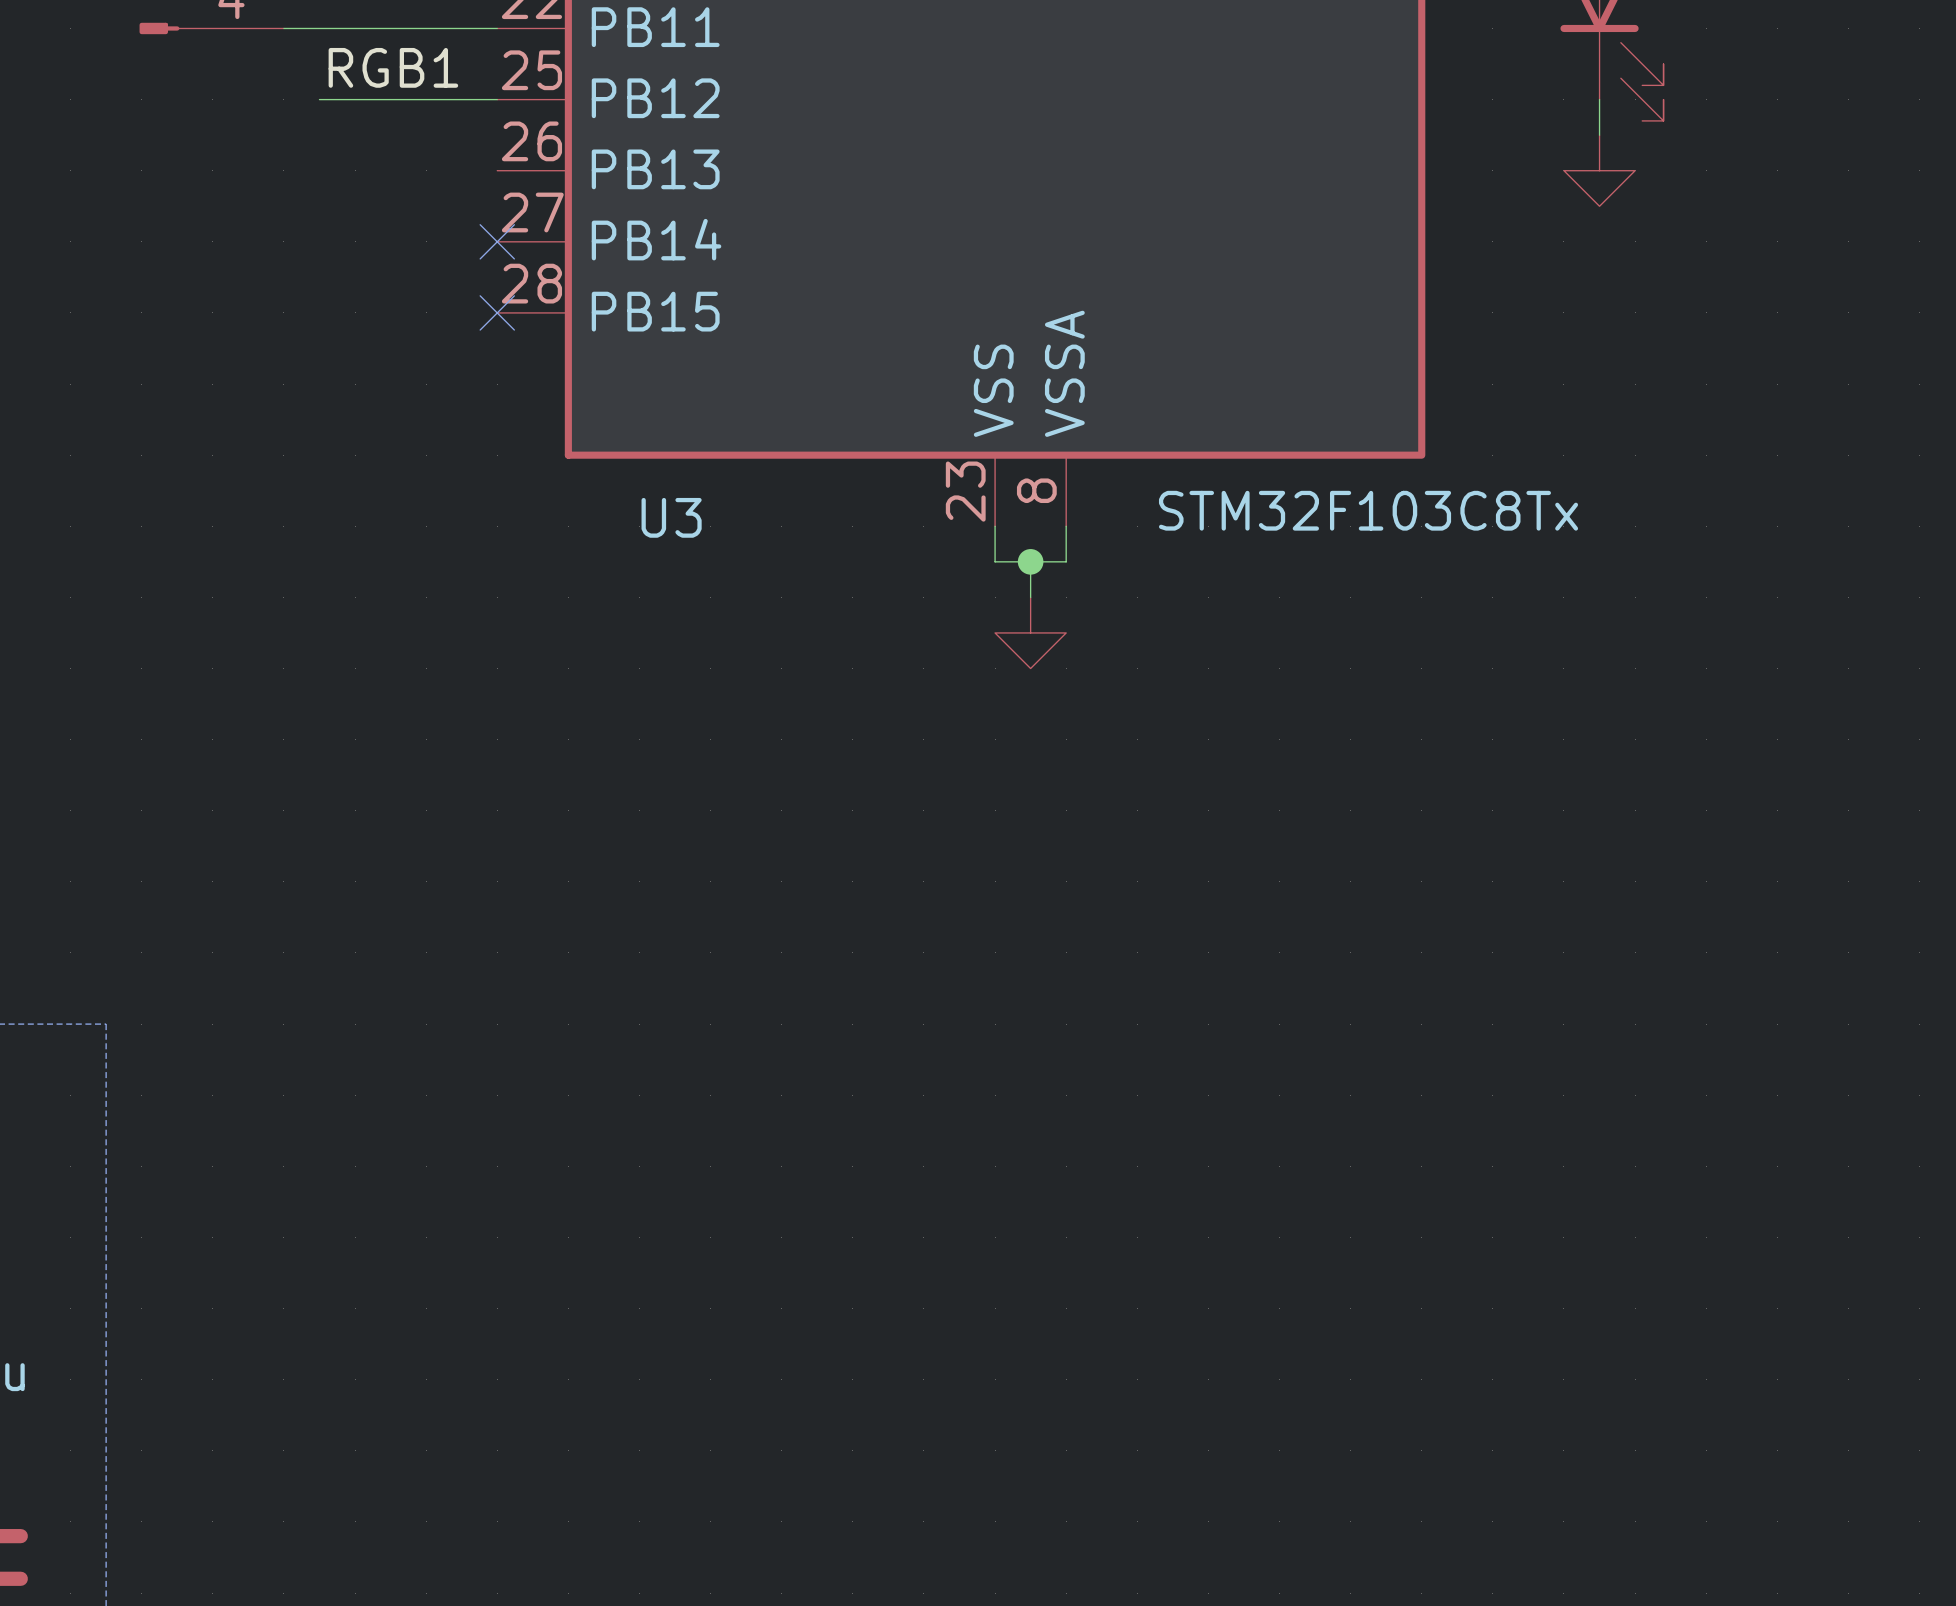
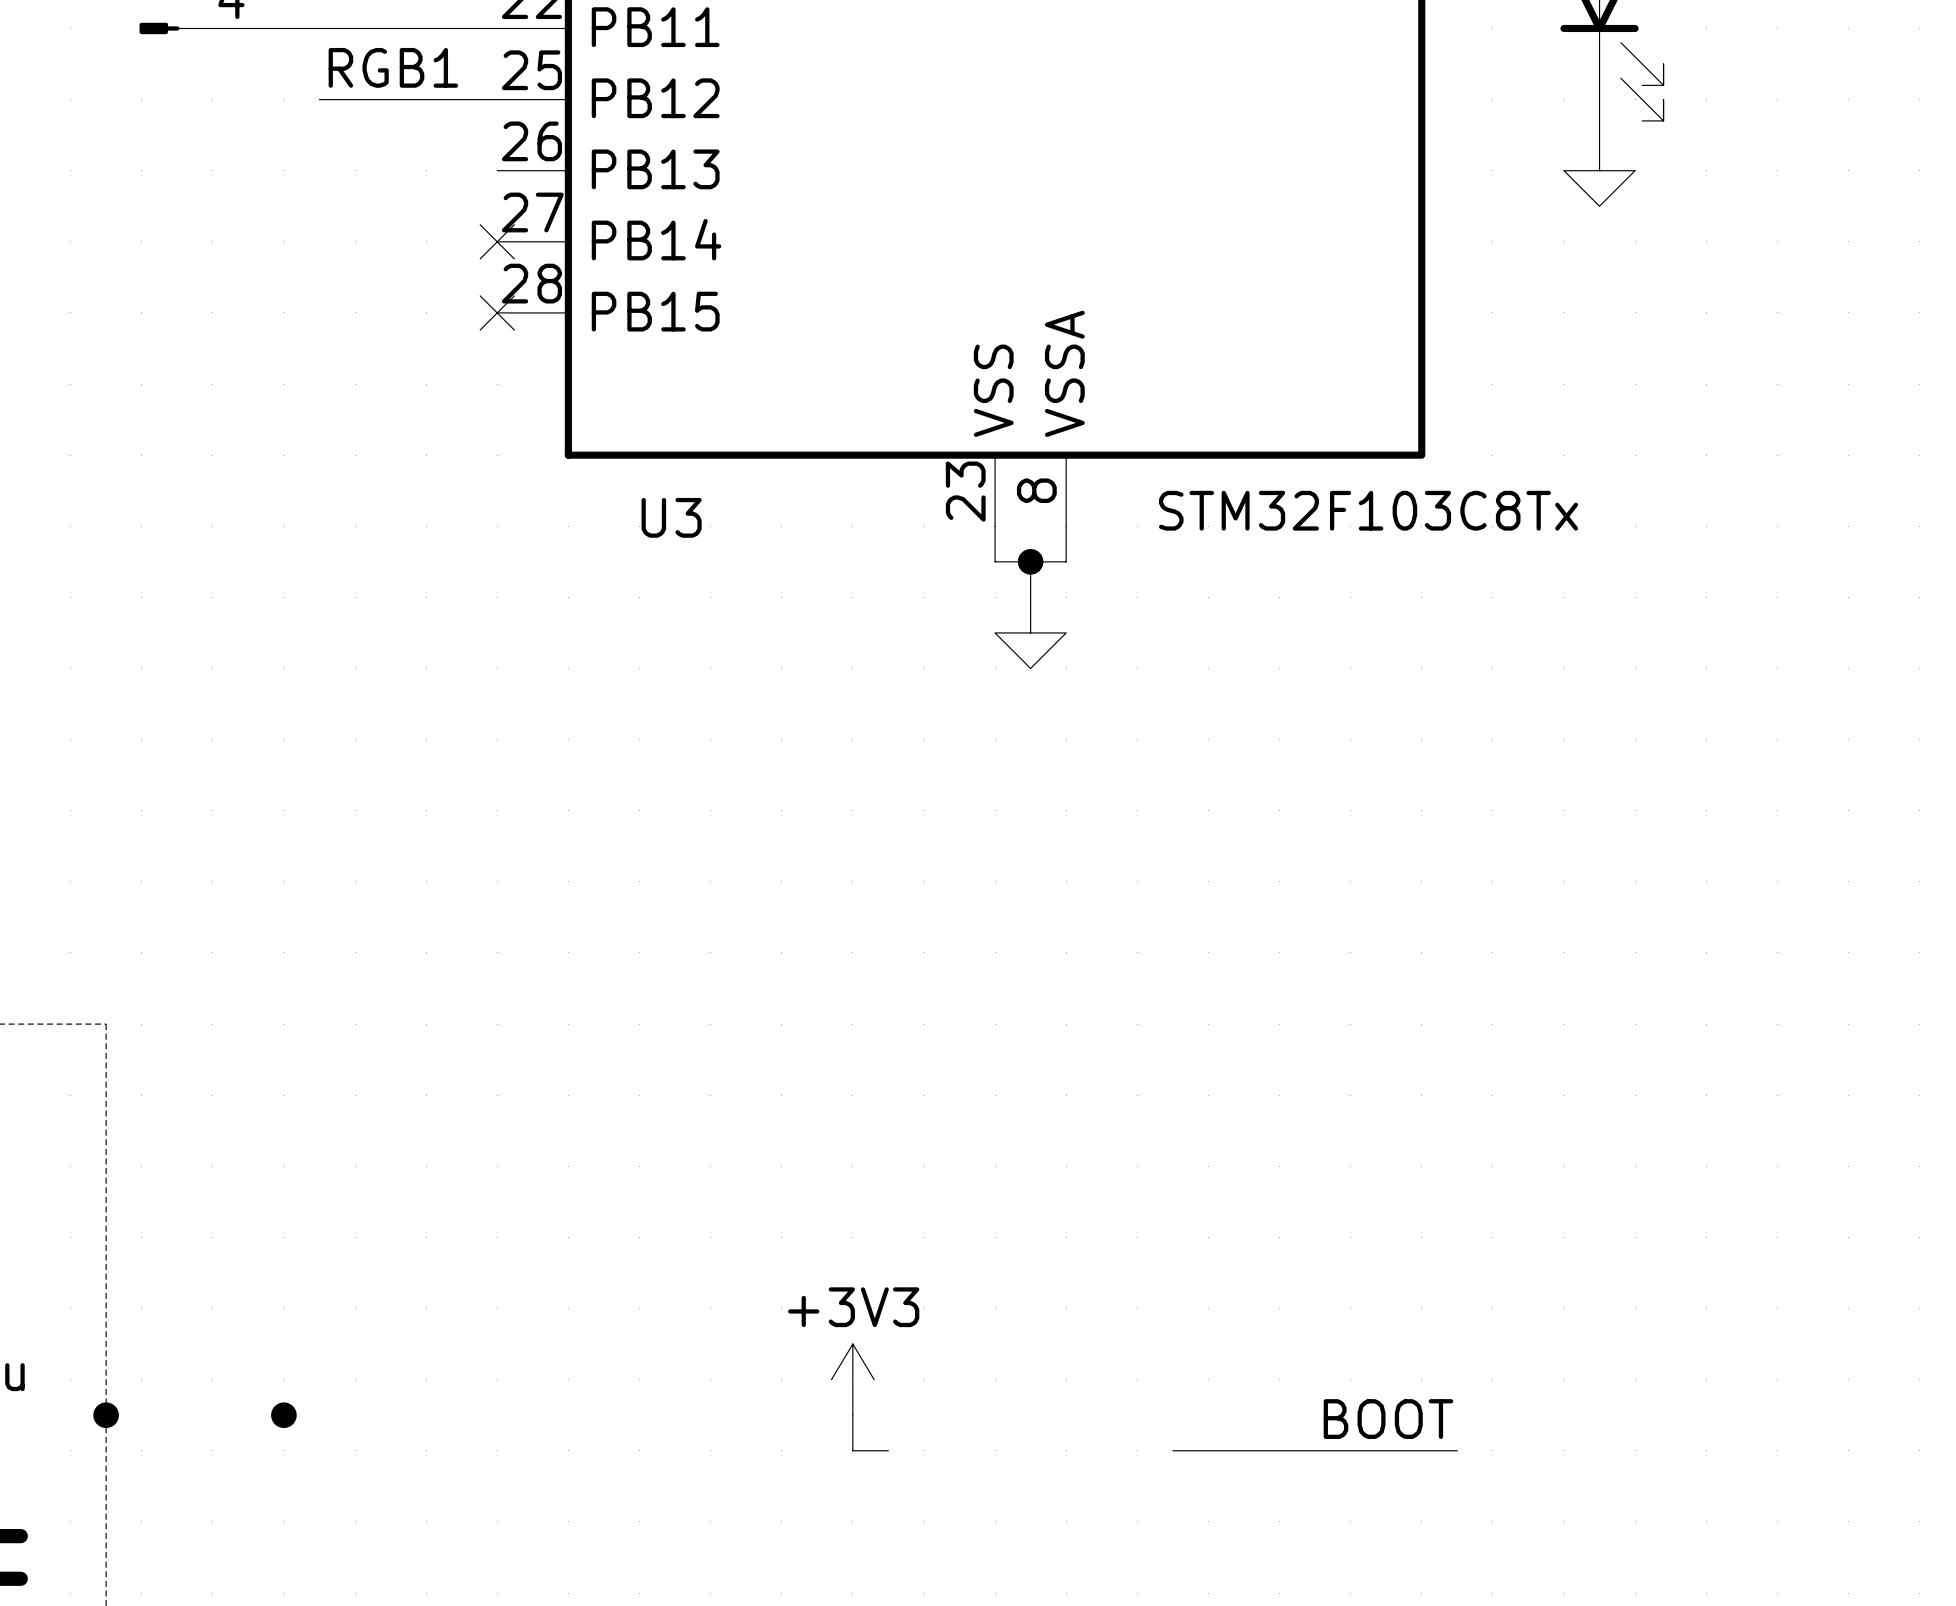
power symbol: none -> +3V3 (852, 1379)
junction: none -> (106, 1415)
junction: none -> (283, 1415)
wire: none -> (852, 1415) (852, 1450) (888, 1450)
label: none -> BOOT (1388, 1419)
wire: none -> (1172, 1450) (1457, 1450)

